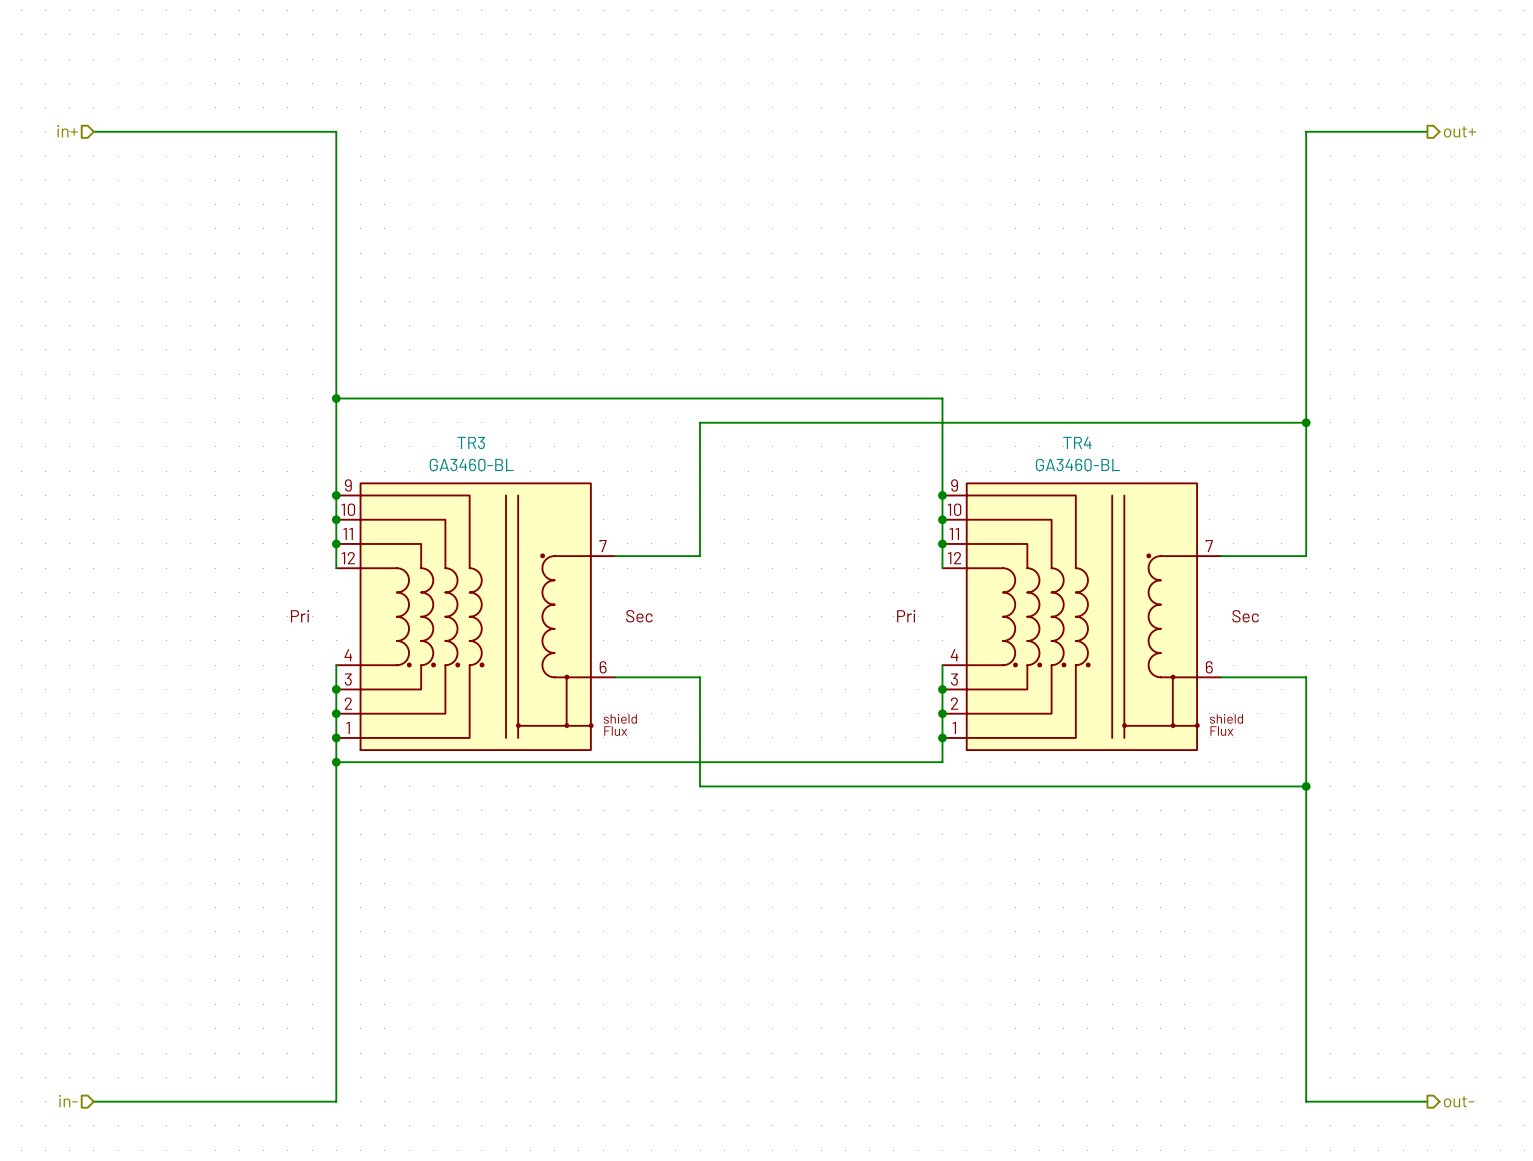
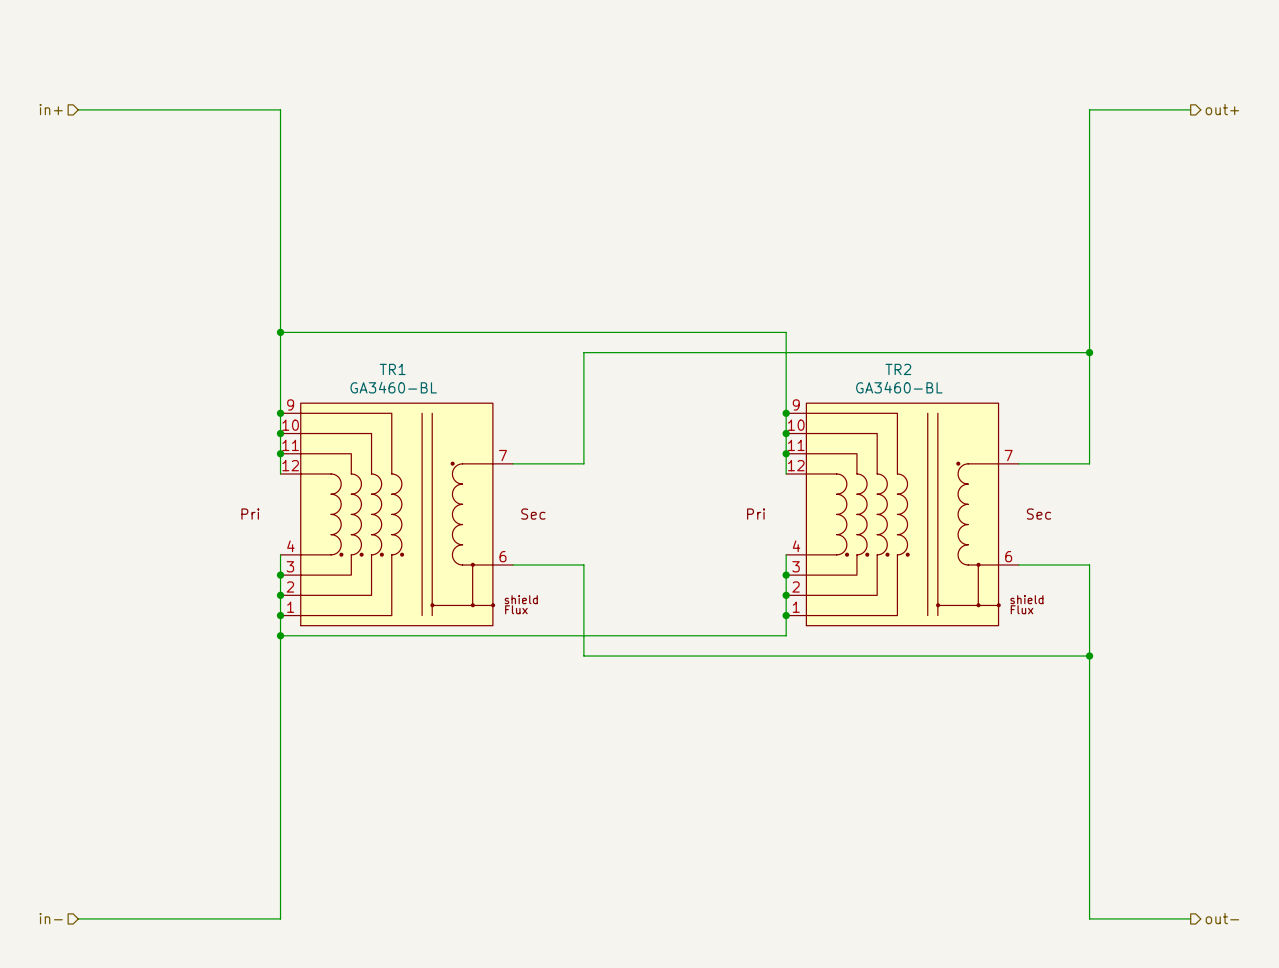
TR3 name: TR3 (471, 442) -> TR1 (392, 369)
TR4 name: TR4 (1077, 442) -> TR2 (898, 369)

